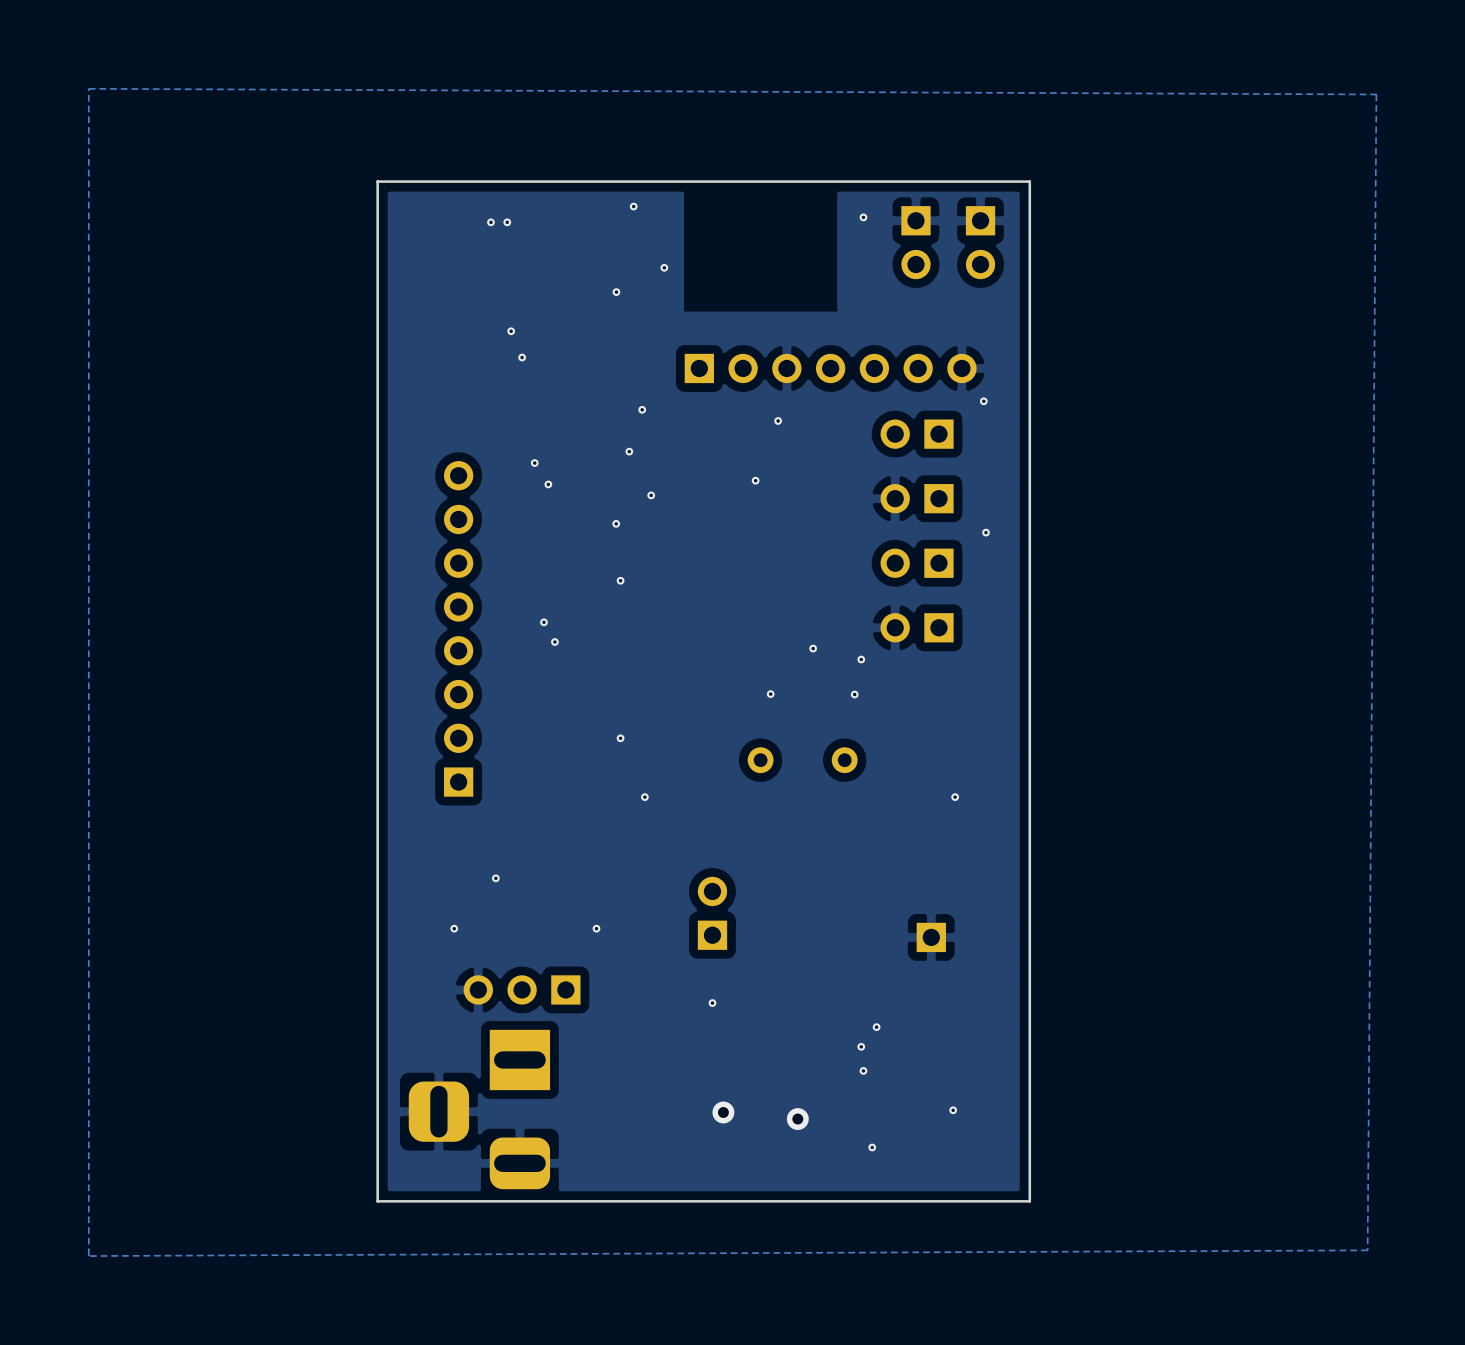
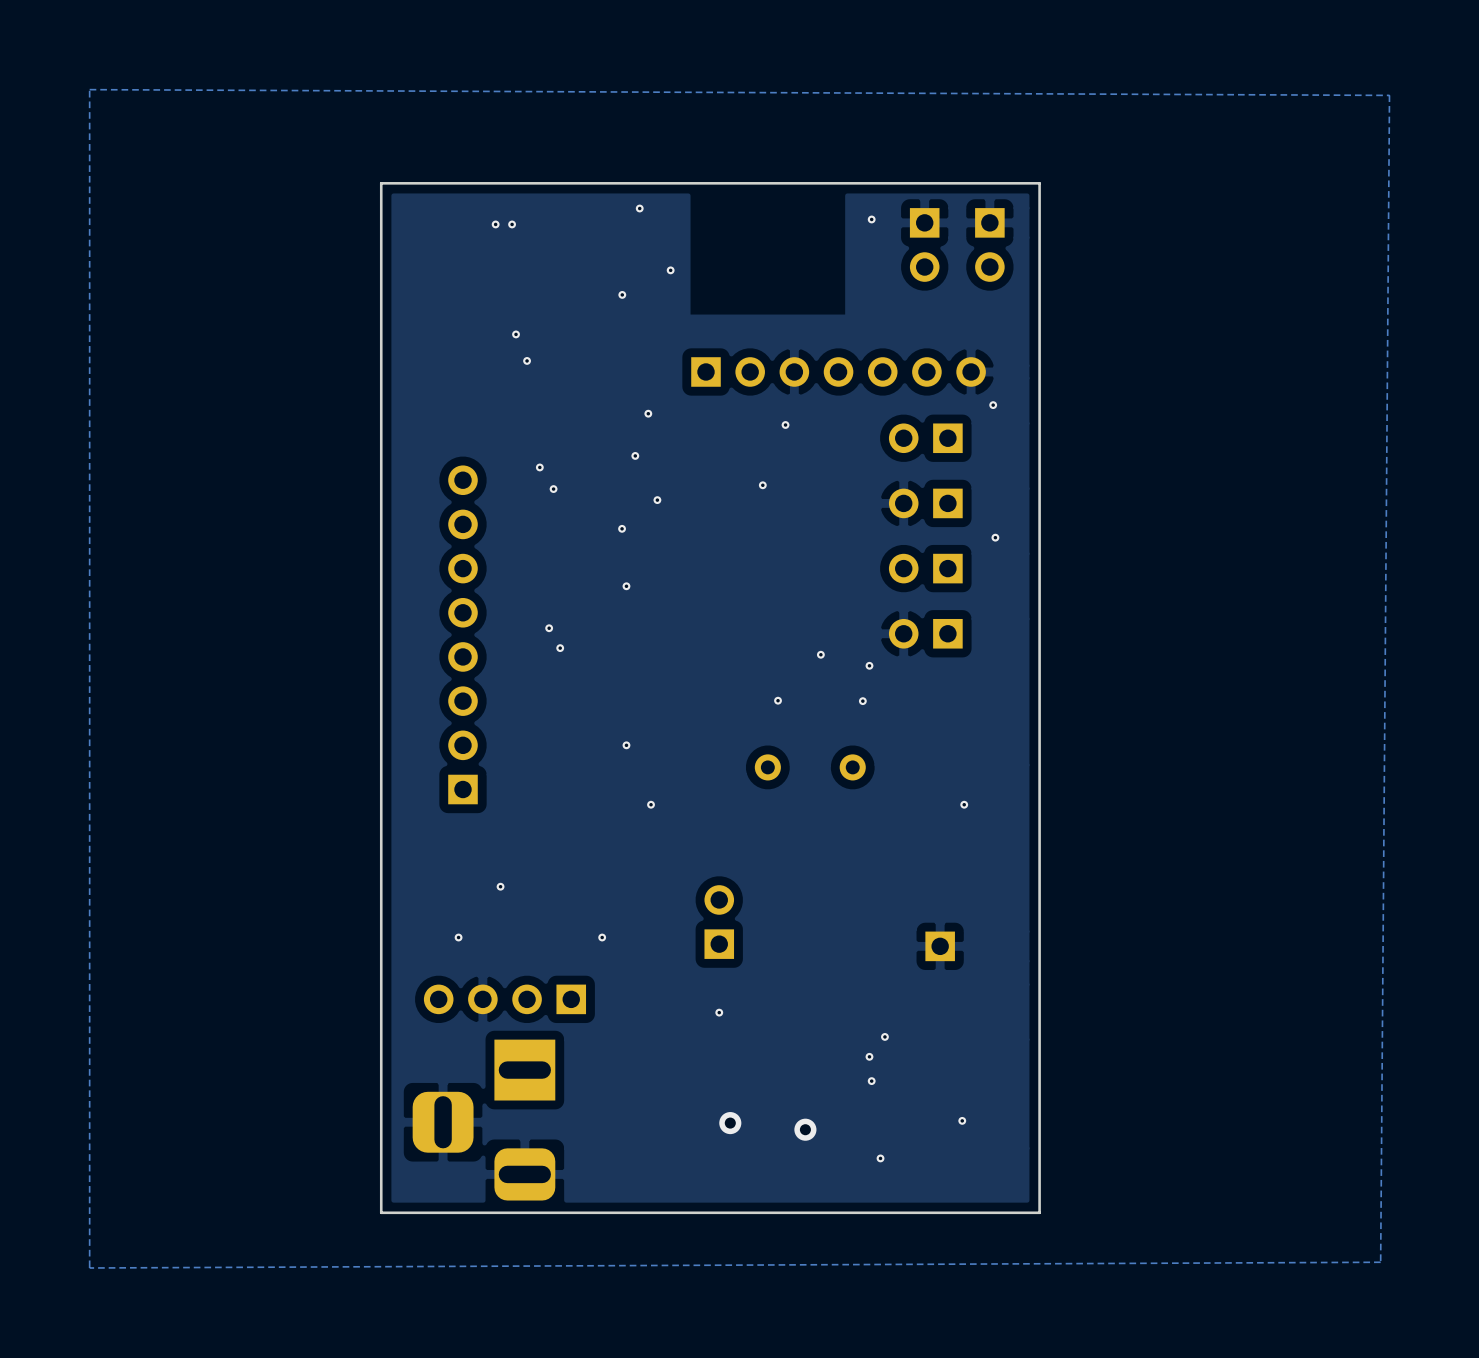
part: none -> (504, 999)
part: (522, 989) -> none

